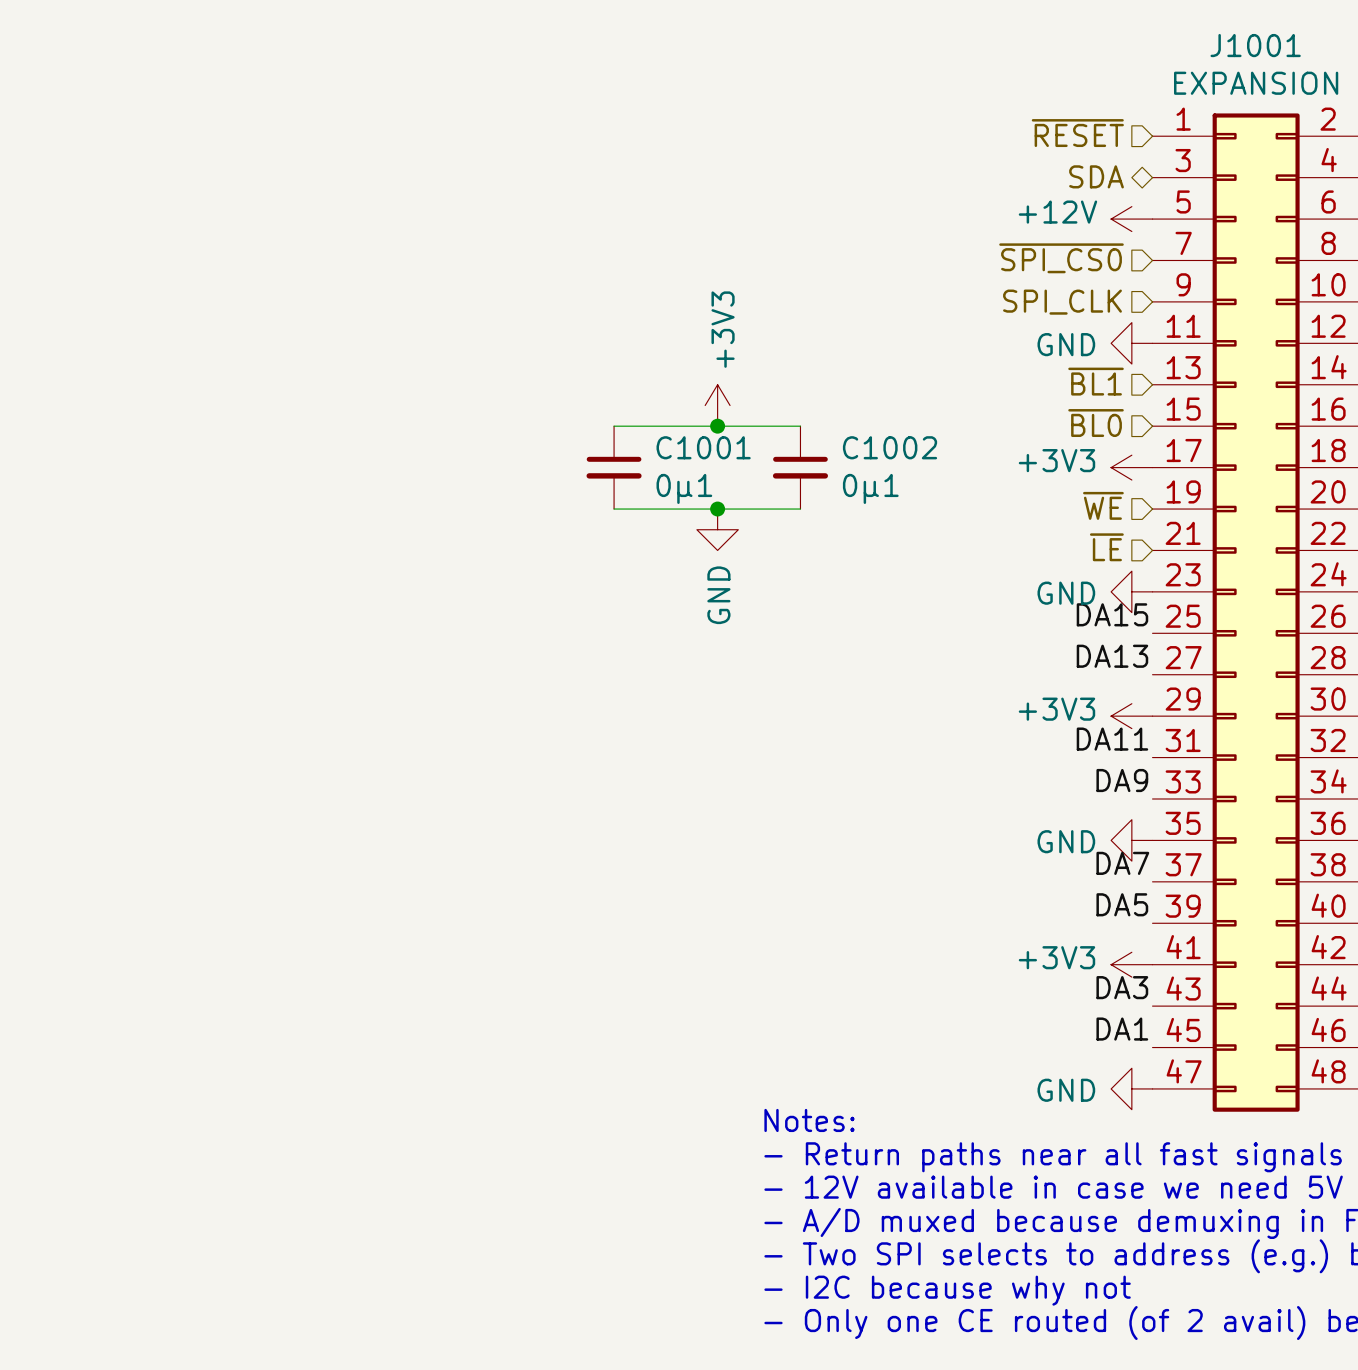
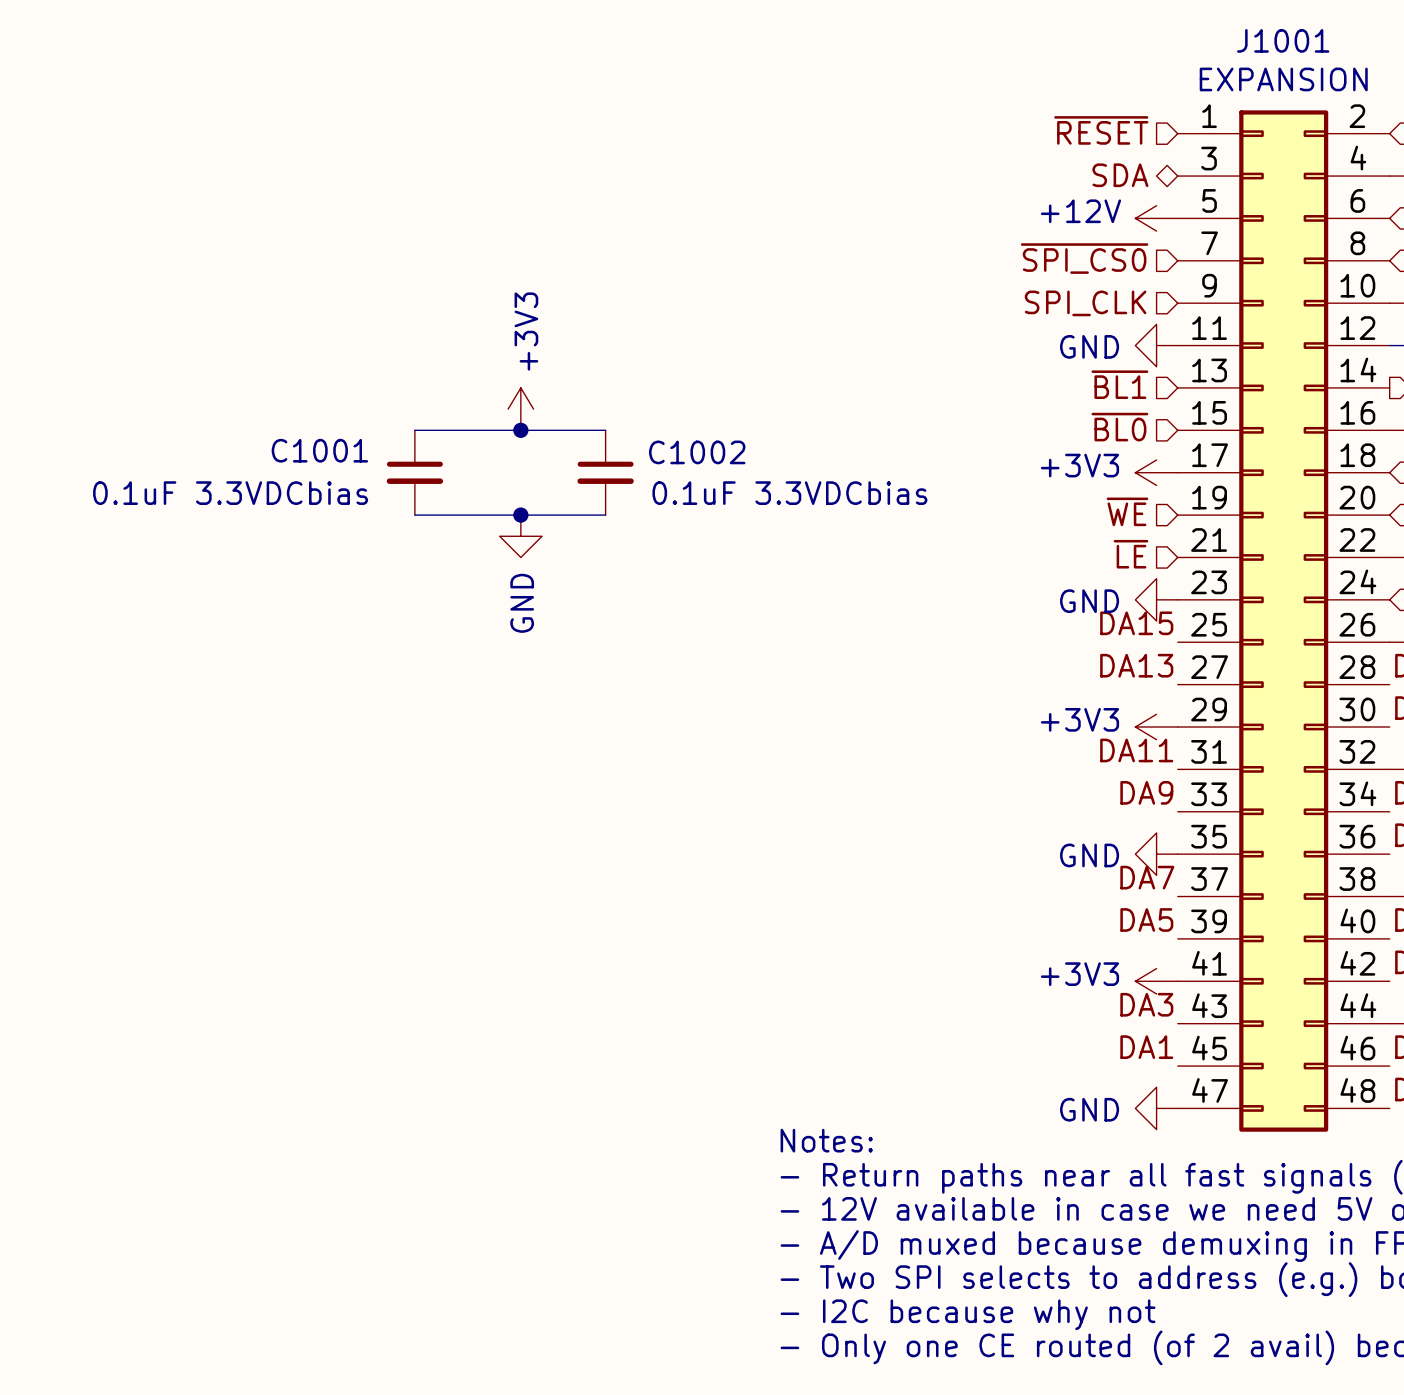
power symbol position: +3V3 (717, 405) -> +3V3 (520, 409)
junction: none -> (520, 430)
wire: (614, 426) (800, 426) -> (414, 430) (605, 430)
junction: (717, 426) -> none
C1001 name position: C1001 (703, 447) -> C1001 (319, 450)
C1001 position: (614, 467) -> (414, 472)
C1002 position: (800, 467) -> (605, 472)
C1001 value: 0µ1 (684, 488) -> 0.1uF 3.3VDCbias (230, 493)
C1002 value: 0µ1 (870, 488) -> 0.1uF 3.3VDCbias (789, 493)
junction: none -> (520, 515)
wire: (614, 509) (800, 509) -> (414, 515) (605, 515)
junction: (717, 509) -> none
power symbol position: GND (717, 529) -> GND (520, 536)

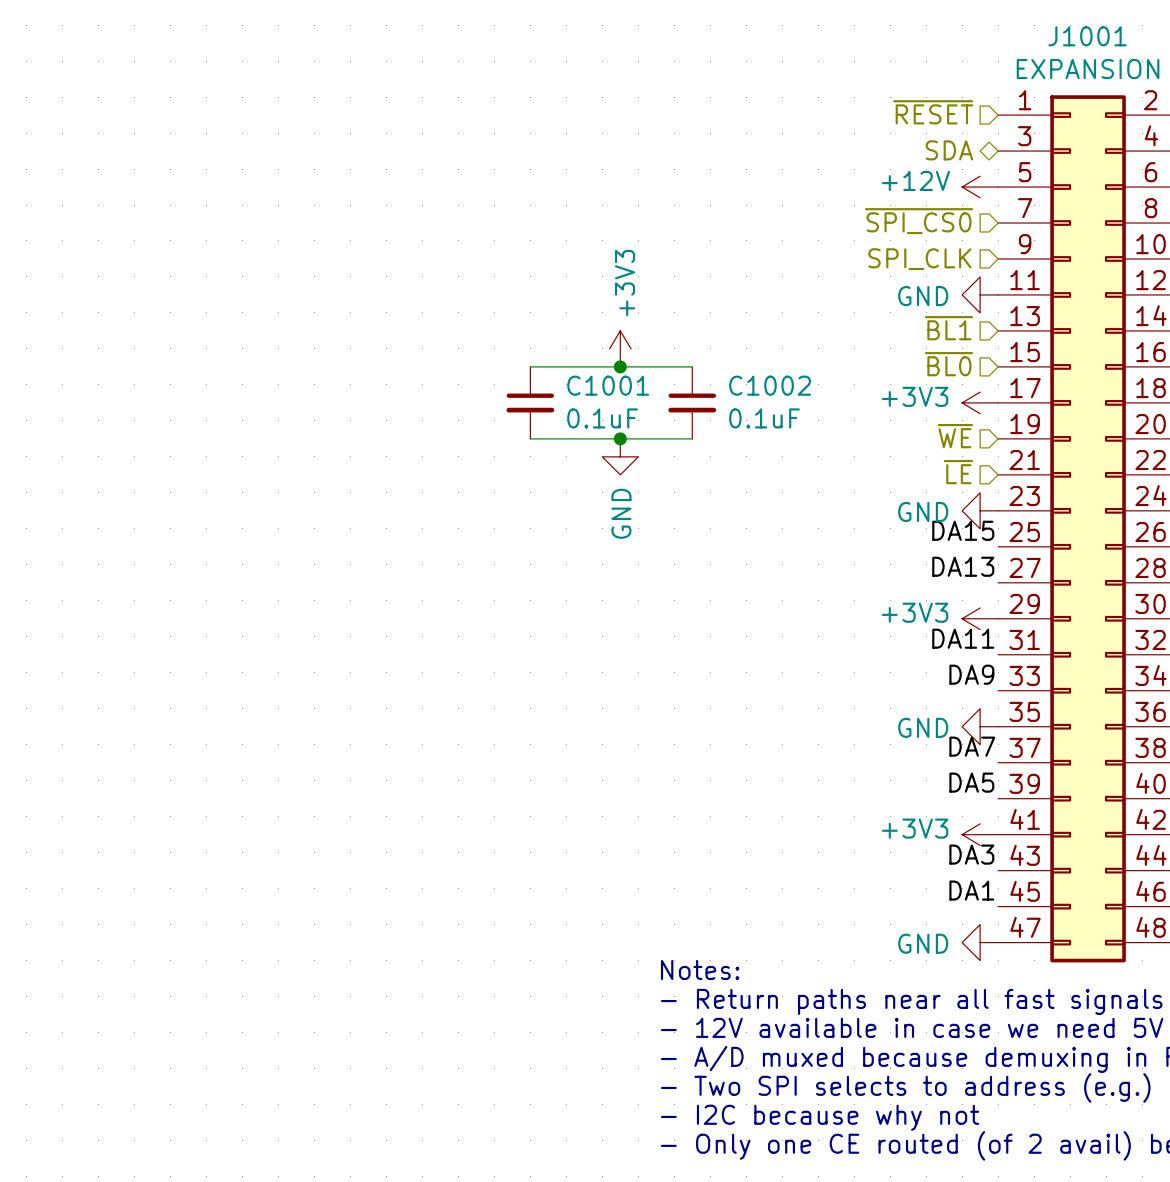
power symbol position: +3V3 (520, 409) -> +3V3 (620, 348)
wire: (414, 430) (605, 430) -> (530, 366) (692, 366)
junction: (520, 430) -> none
junction: none -> (620, 366)
C1001 name position: C1001 (319, 450) -> C1001 (608, 385)
C1001 position: (414, 472) -> (530, 402)
C1002 position: (605, 472) -> (692, 402)
C1001 value: 0.1uF 3.3VDCbias (230, 493) -> 0.1uF (602, 418)
C1002 value: 0.1uF 3.3VDCbias (789, 493) -> 0.1uF (764, 418)
wire: (414, 515) (605, 515) -> (530, 438) (692, 438)
junction: (520, 515) -> none
junction: none -> (620, 438)
power symbol position: GND (520, 536) -> GND (620, 456)

